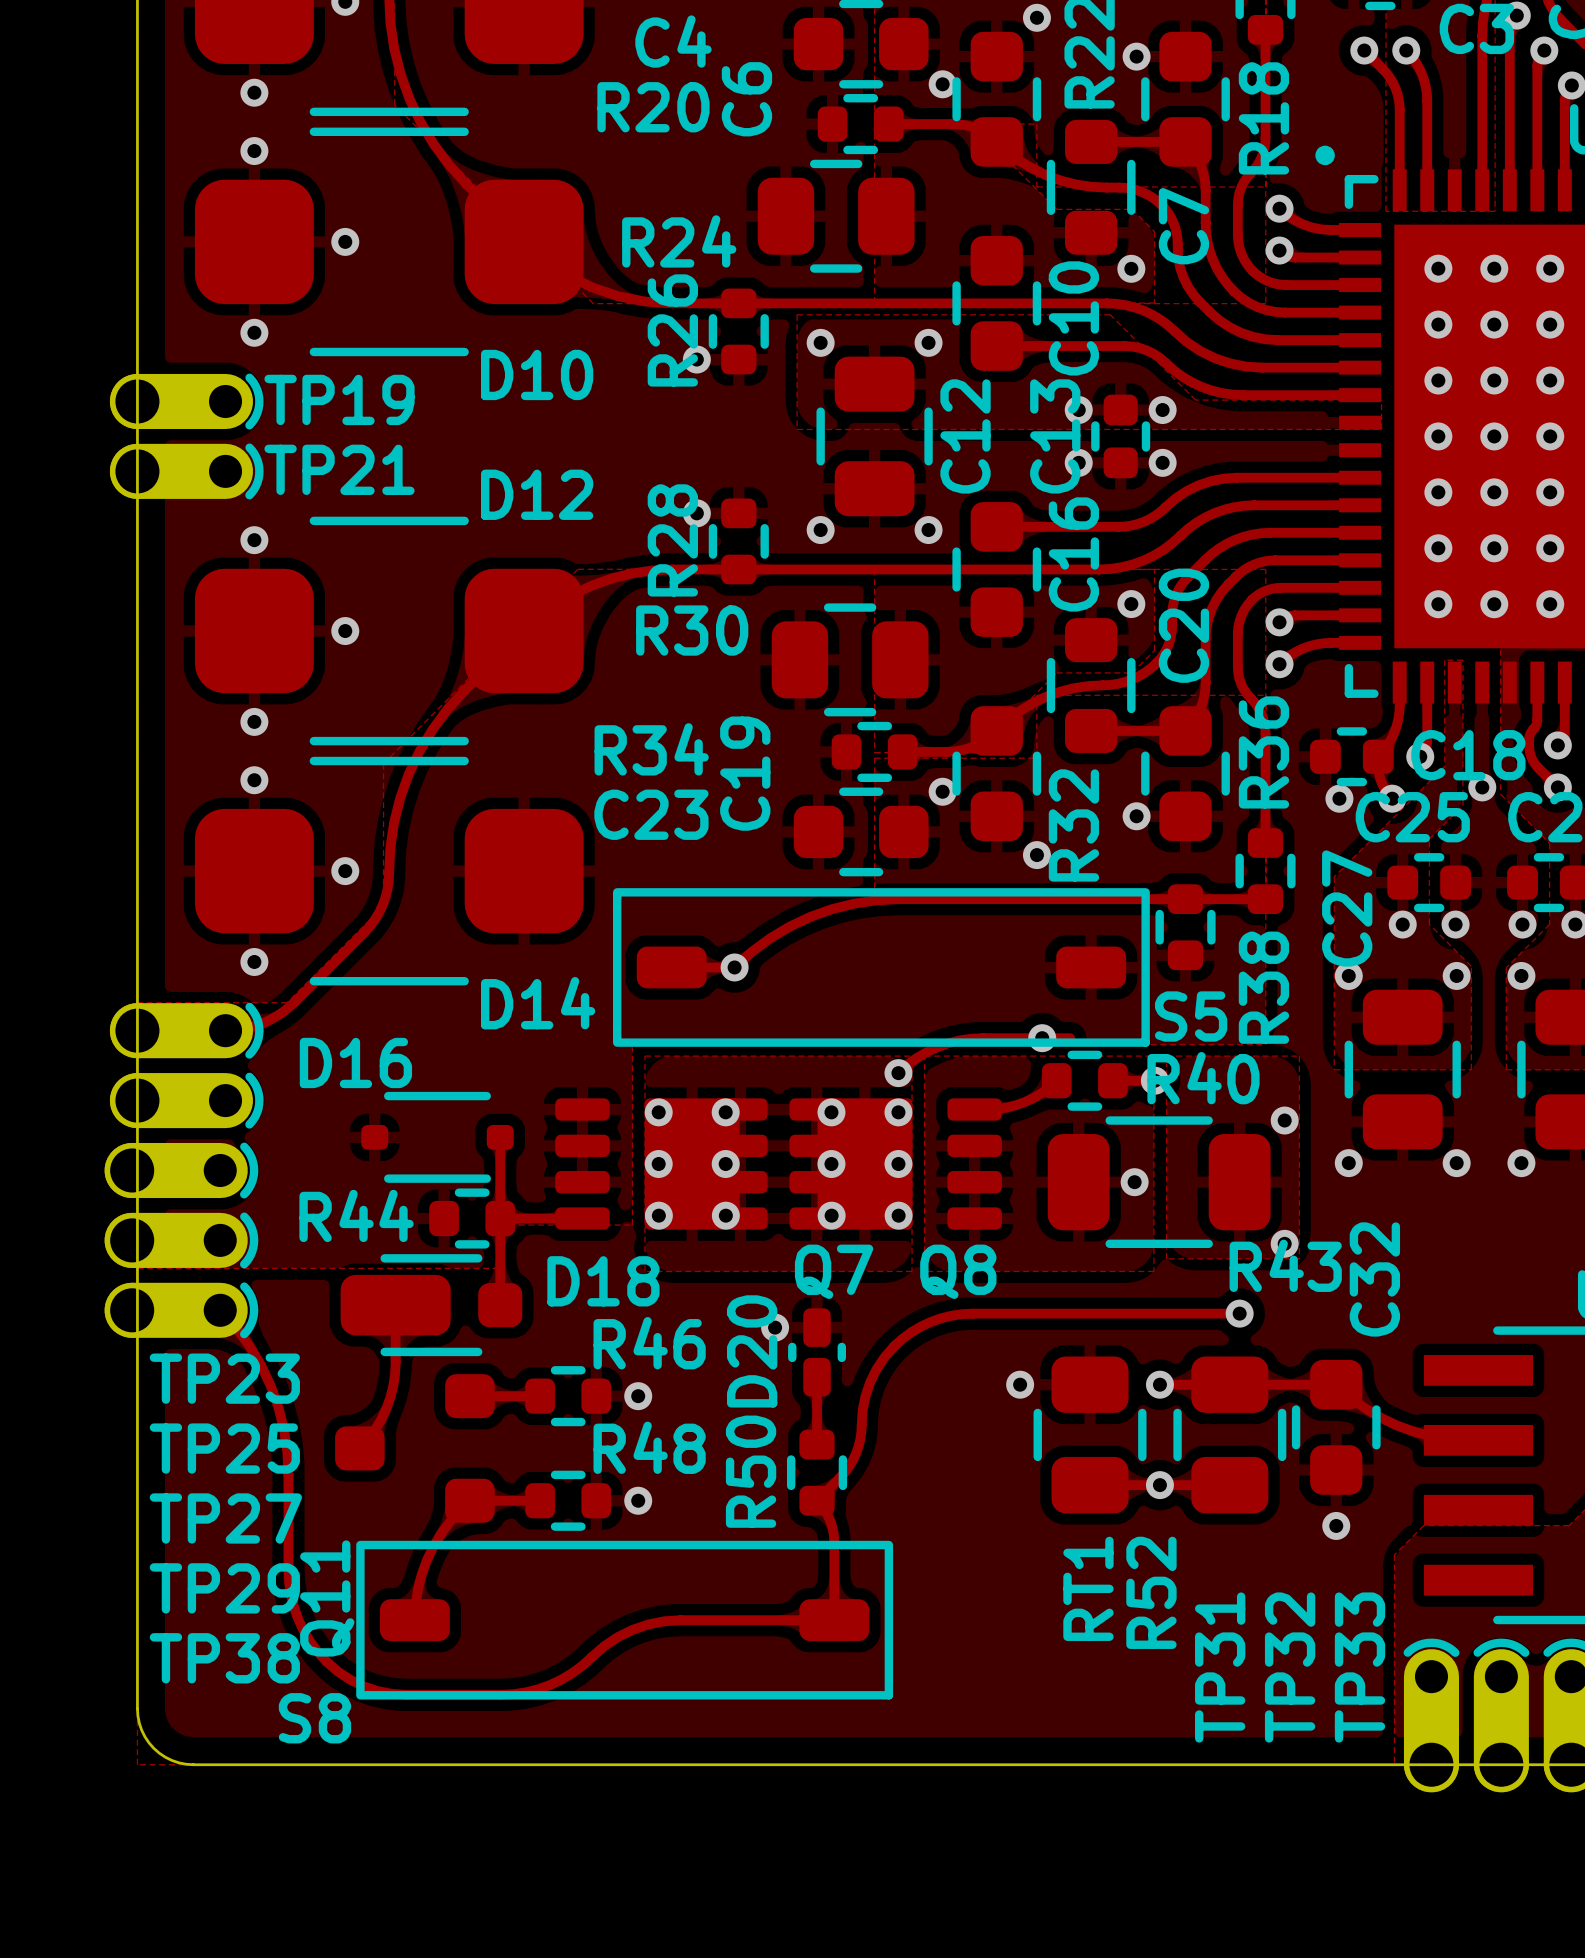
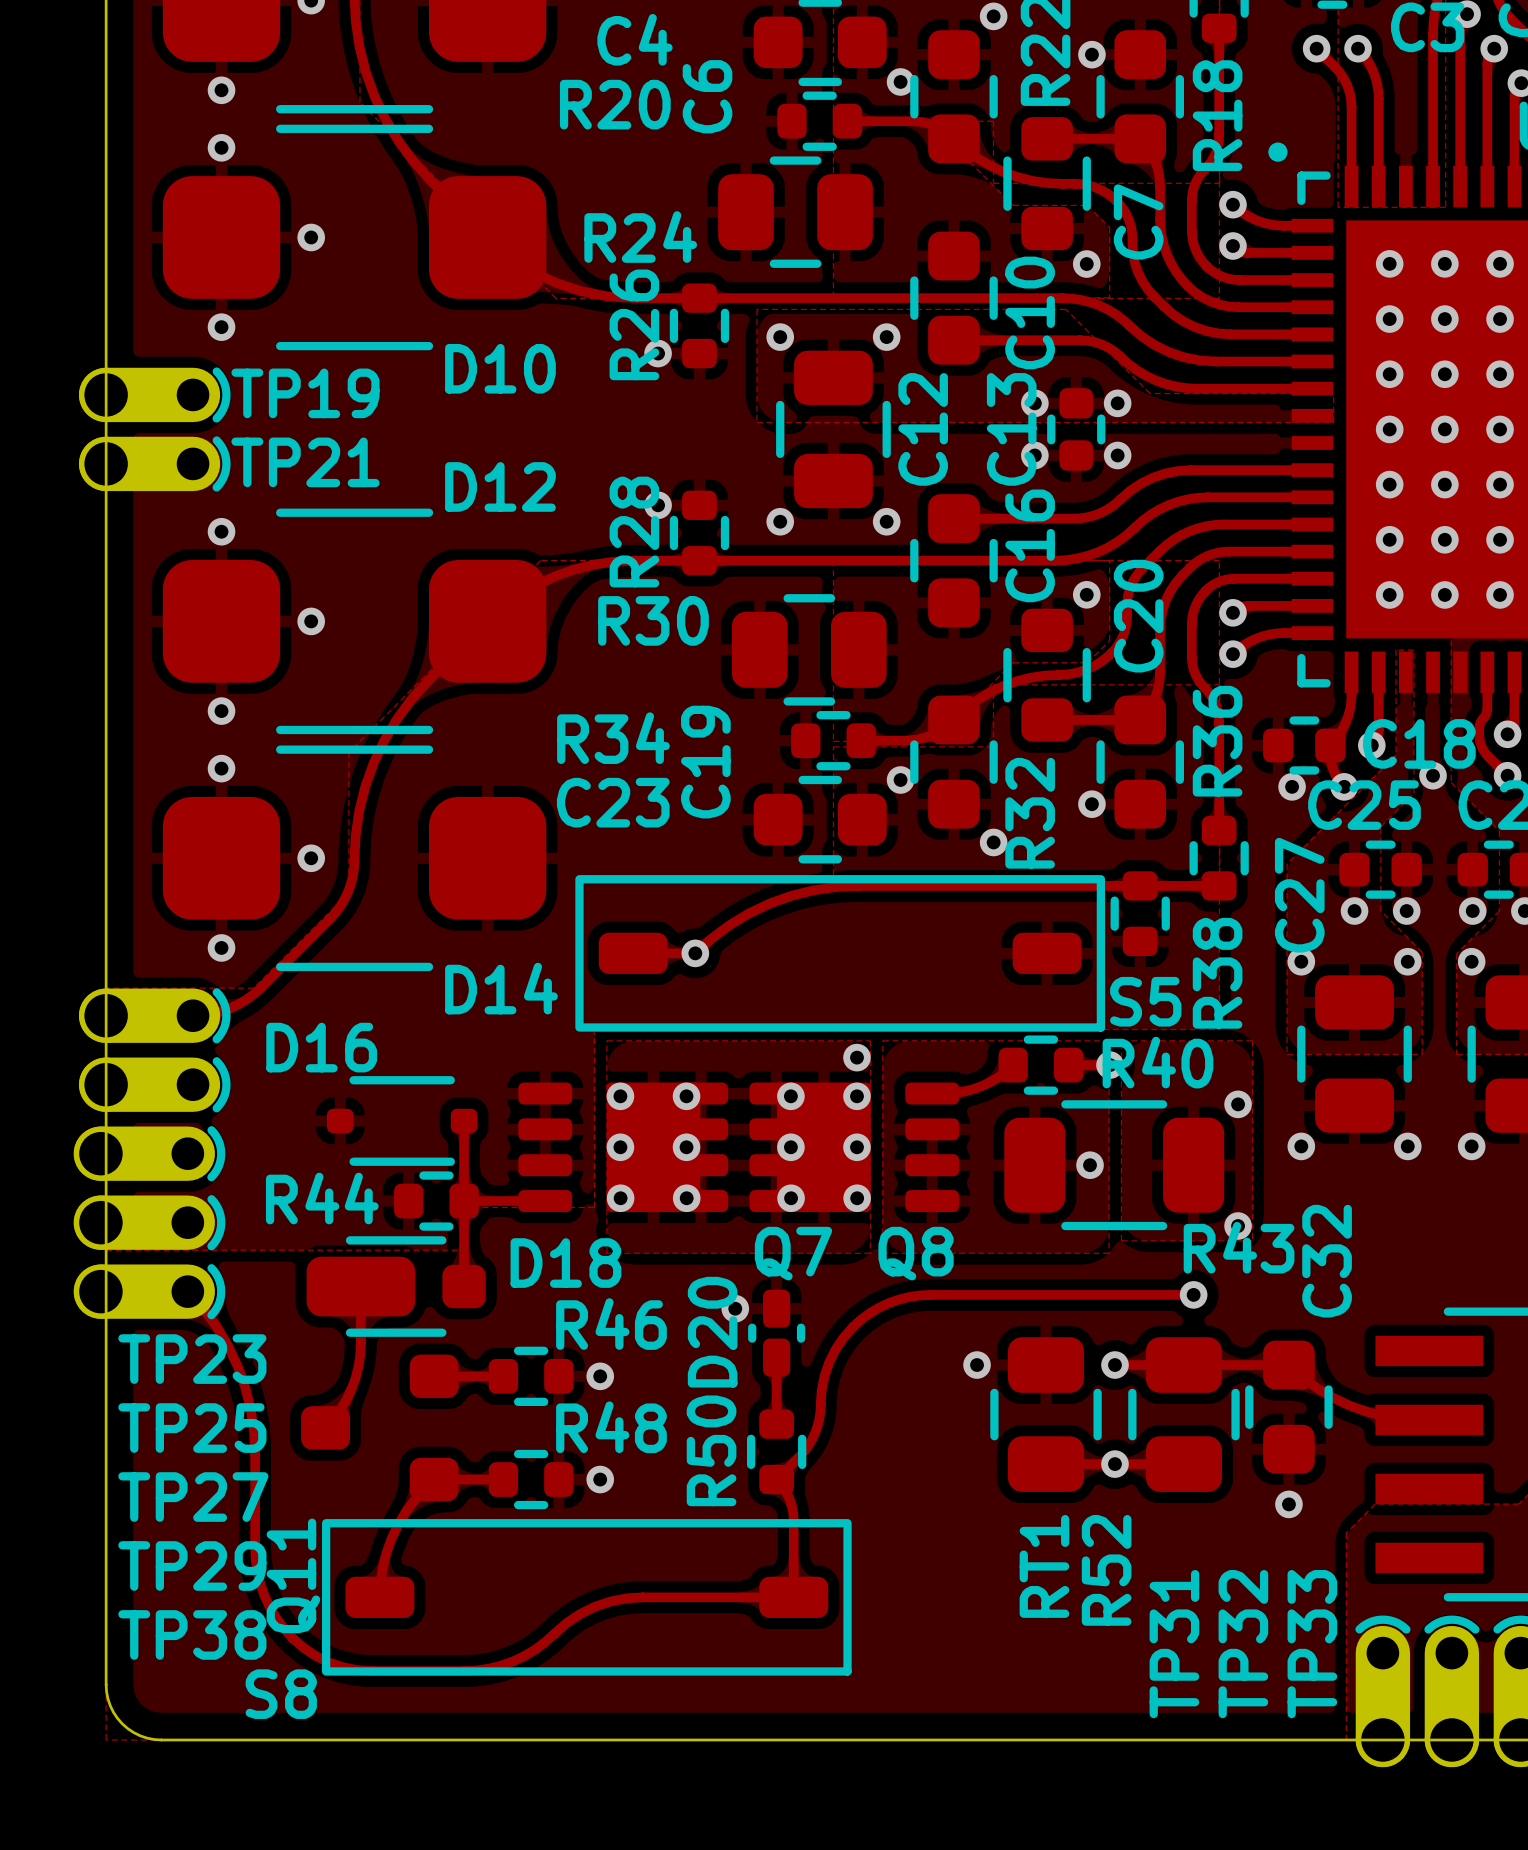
via: (1042, 1038) -> none
track: (1070, 1038) (982, 1038) (959, 1040) (926, 1052) (898, 1073) -> none

